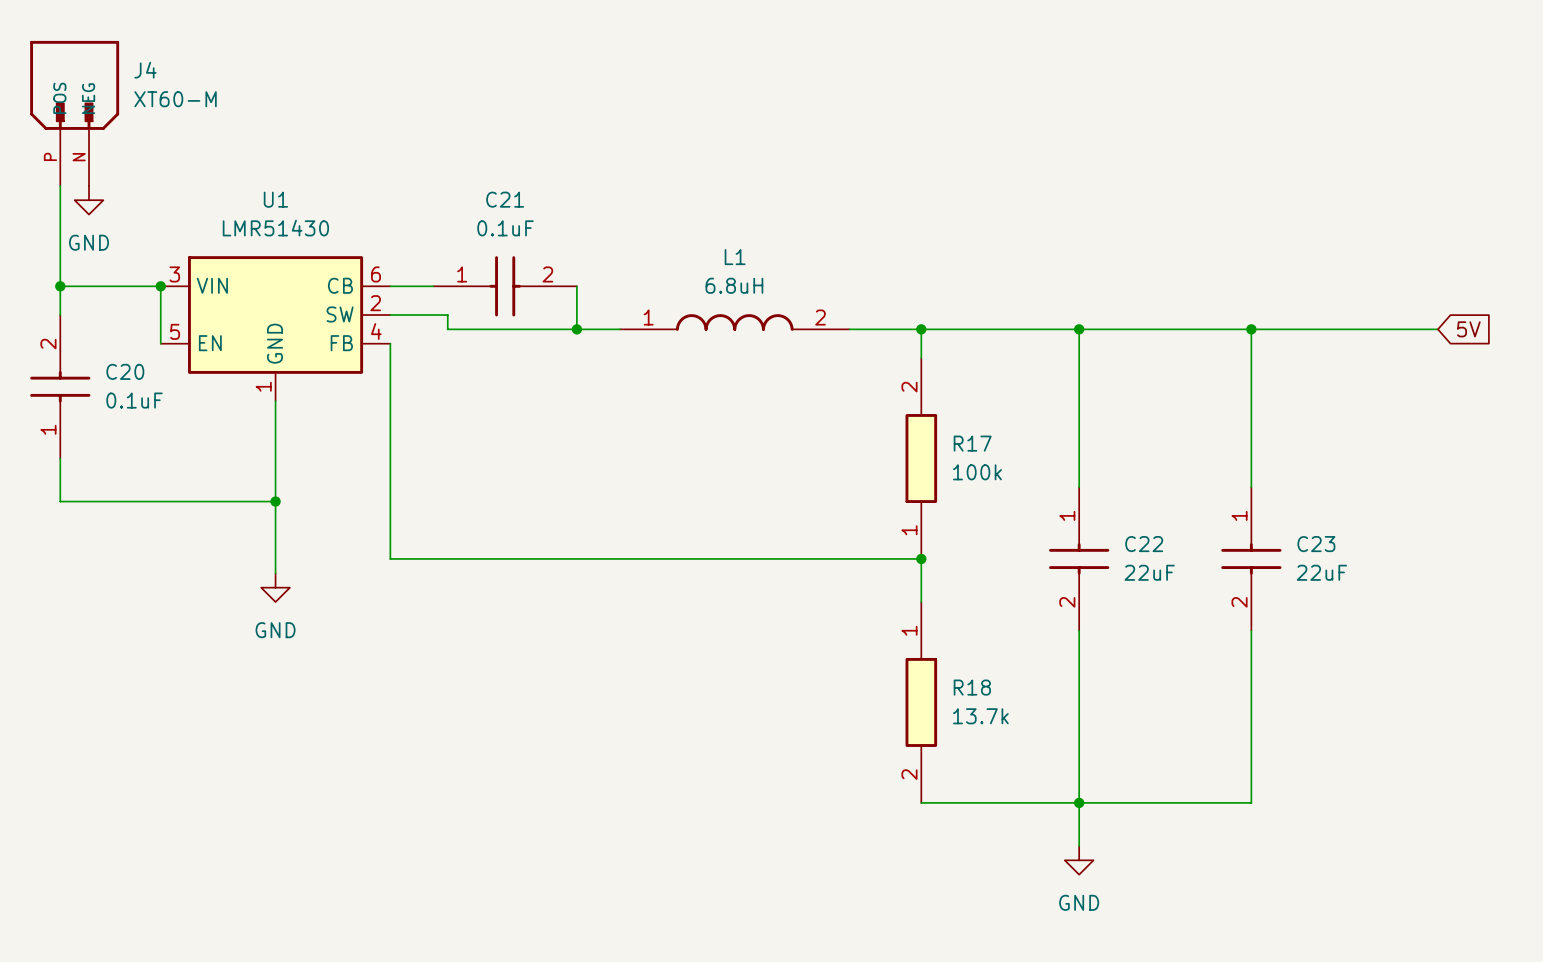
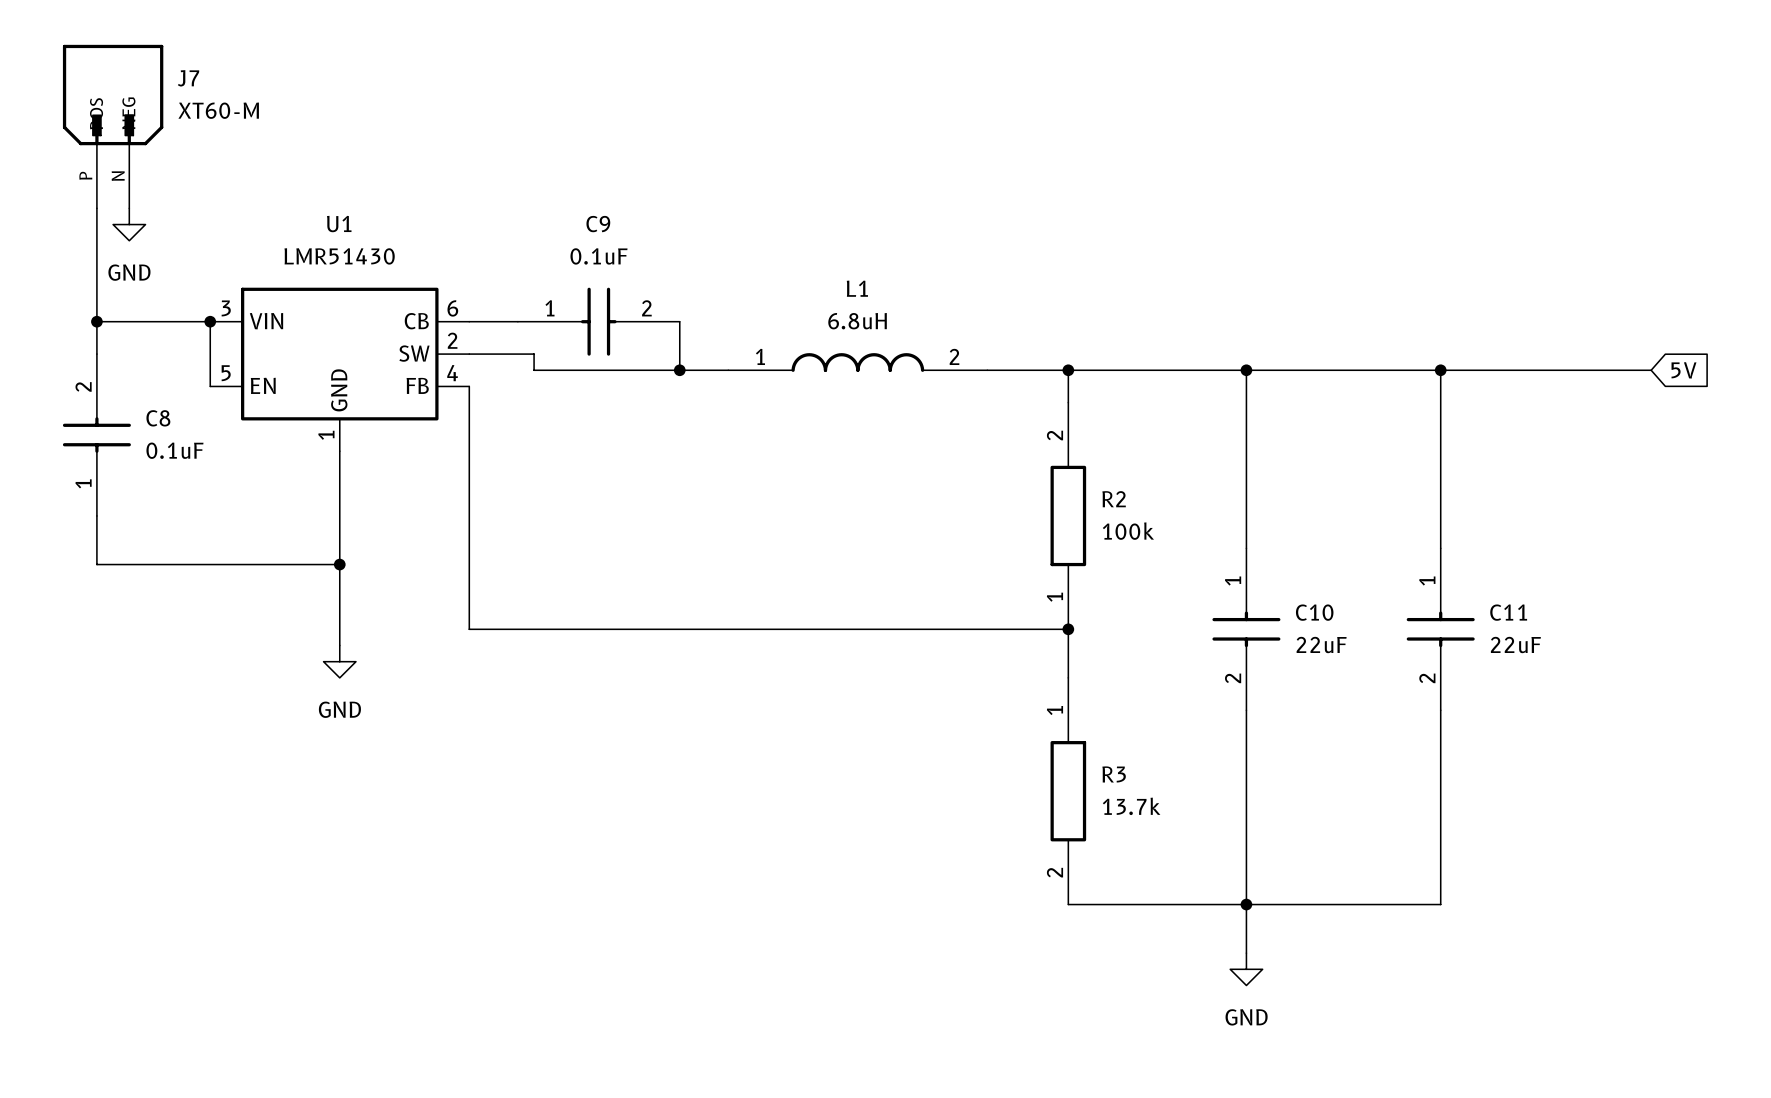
J4 name: J4 (145, 70) -> J7 (188, 78)
C21 name: C21 (505, 199) -> C9 (598, 224)
C20 name: C20 (125, 371) -> C8 (158, 418)
R17 name: R17 (972, 443) -> R2 (1114, 499)
C22 name: C22 (1144, 544) -> C10 (1314, 612)
C23 name: C23 (1316, 544) -> C11 (1508, 612)
R18 name: R18 (972, 687) -> R3 (1114, 774)

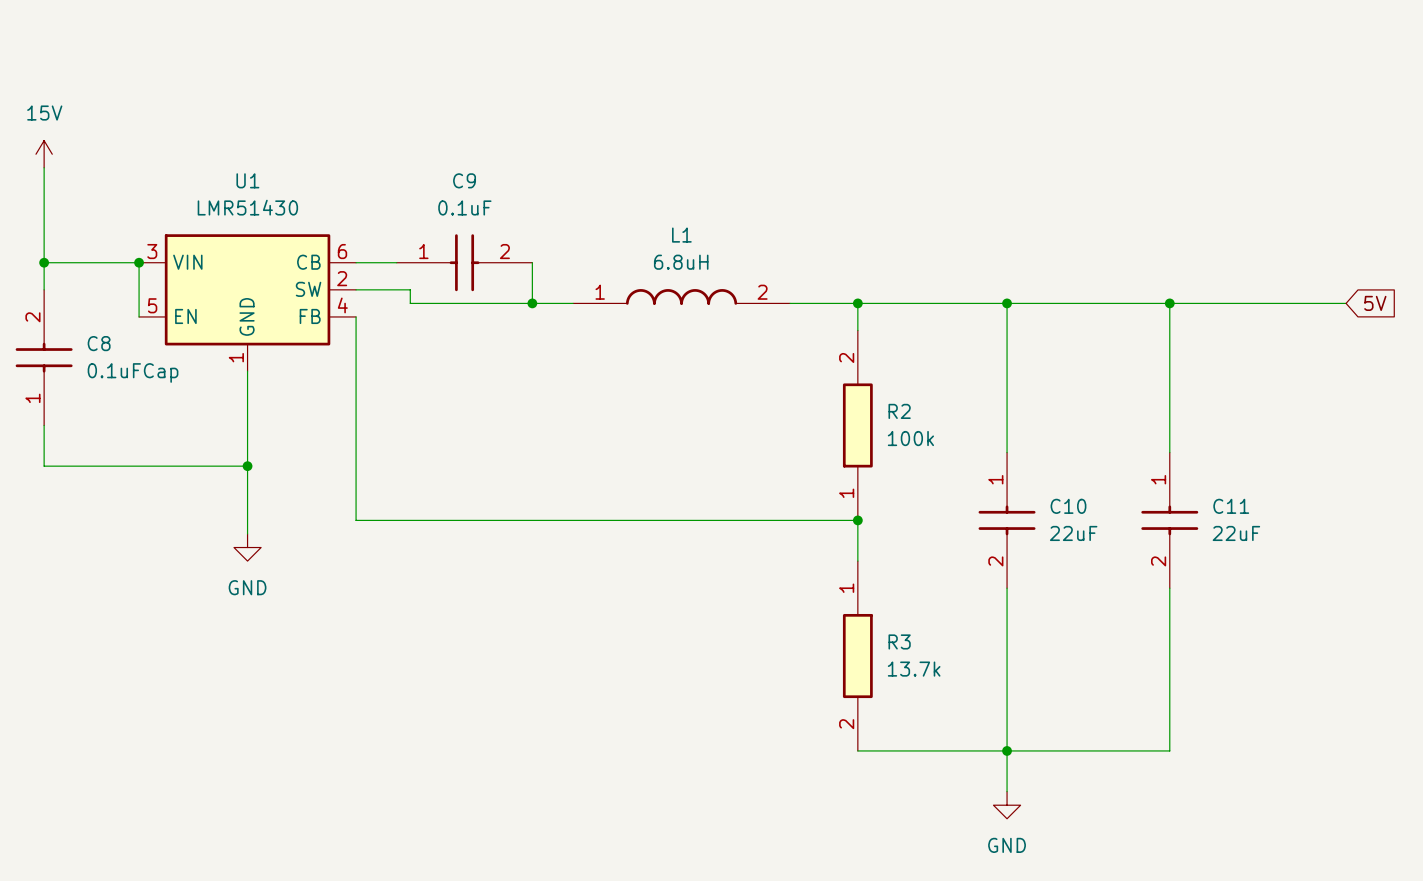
J7: XT60-M (113, 126) -> none
power symbol: none -> 15V (44, 154)
power symbol: GND (129, 224) -> none
C8 value: 0.1uF (174, 450) -> 0.1uFCap (133, 372)

